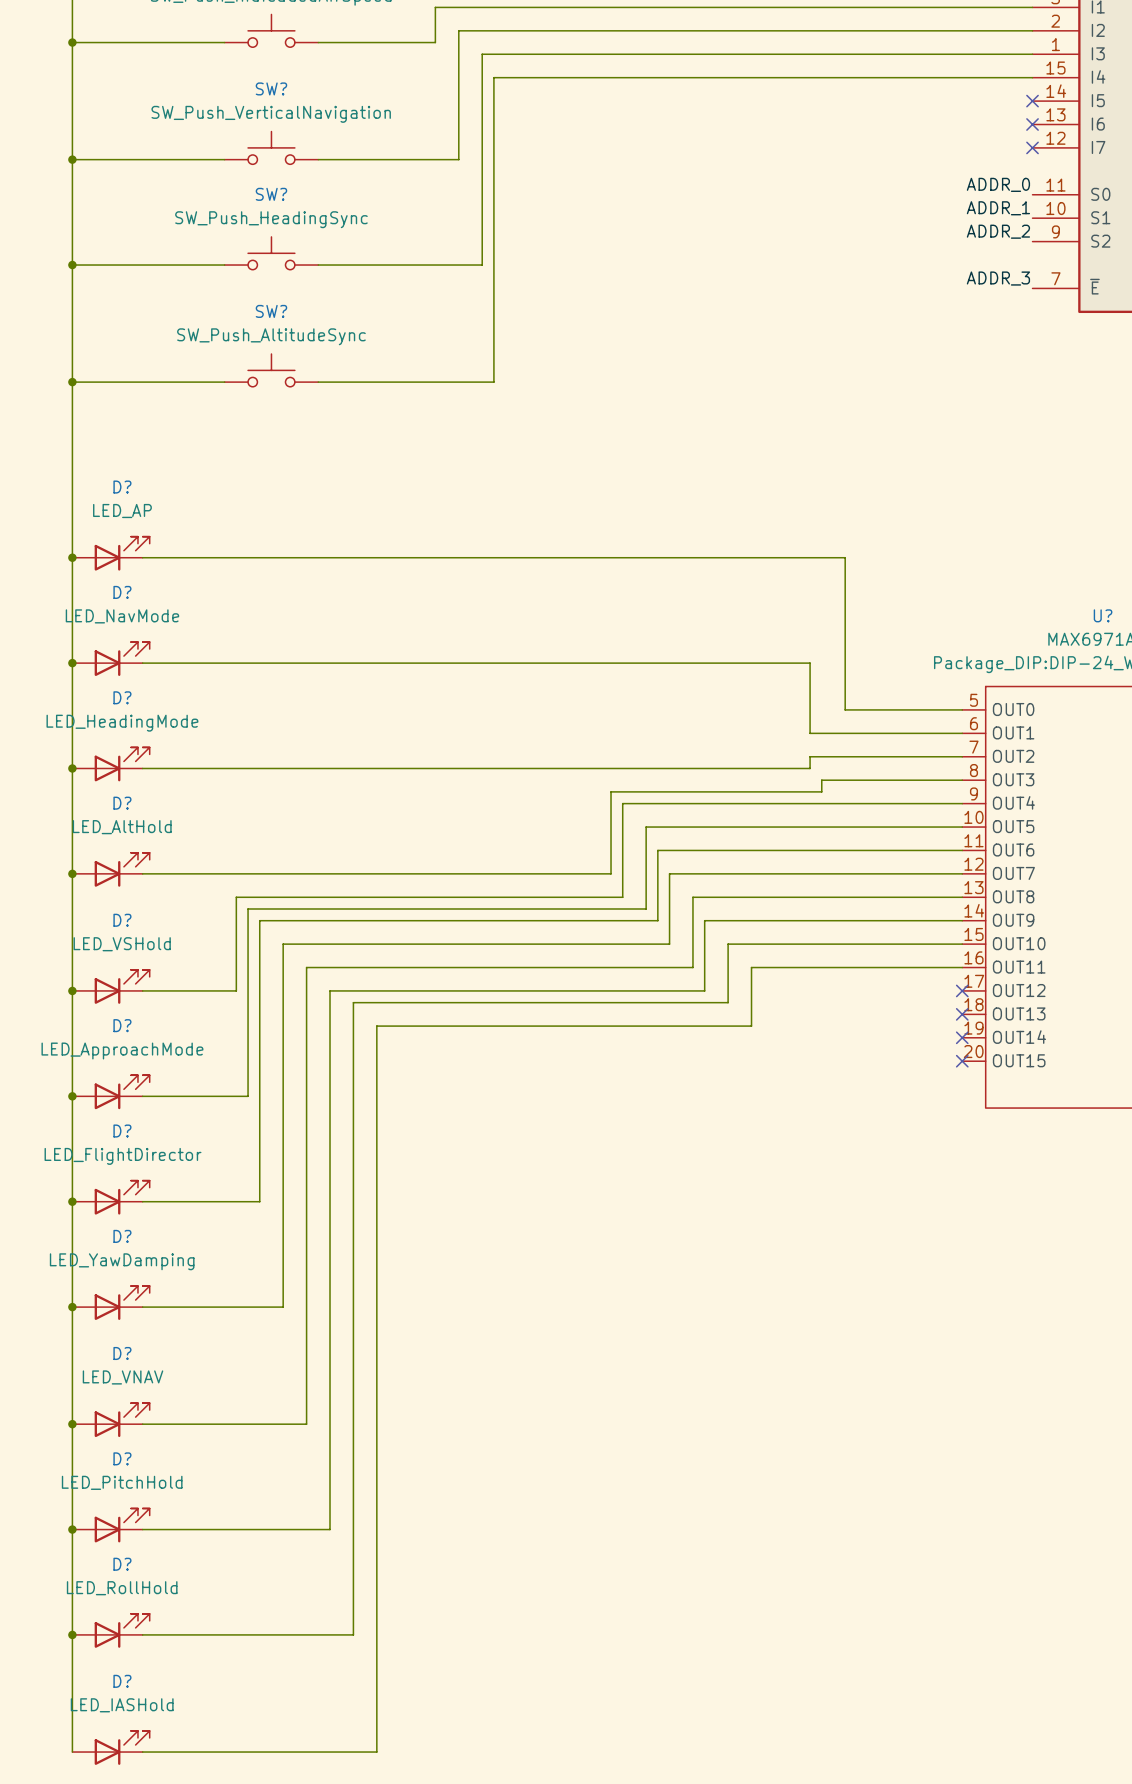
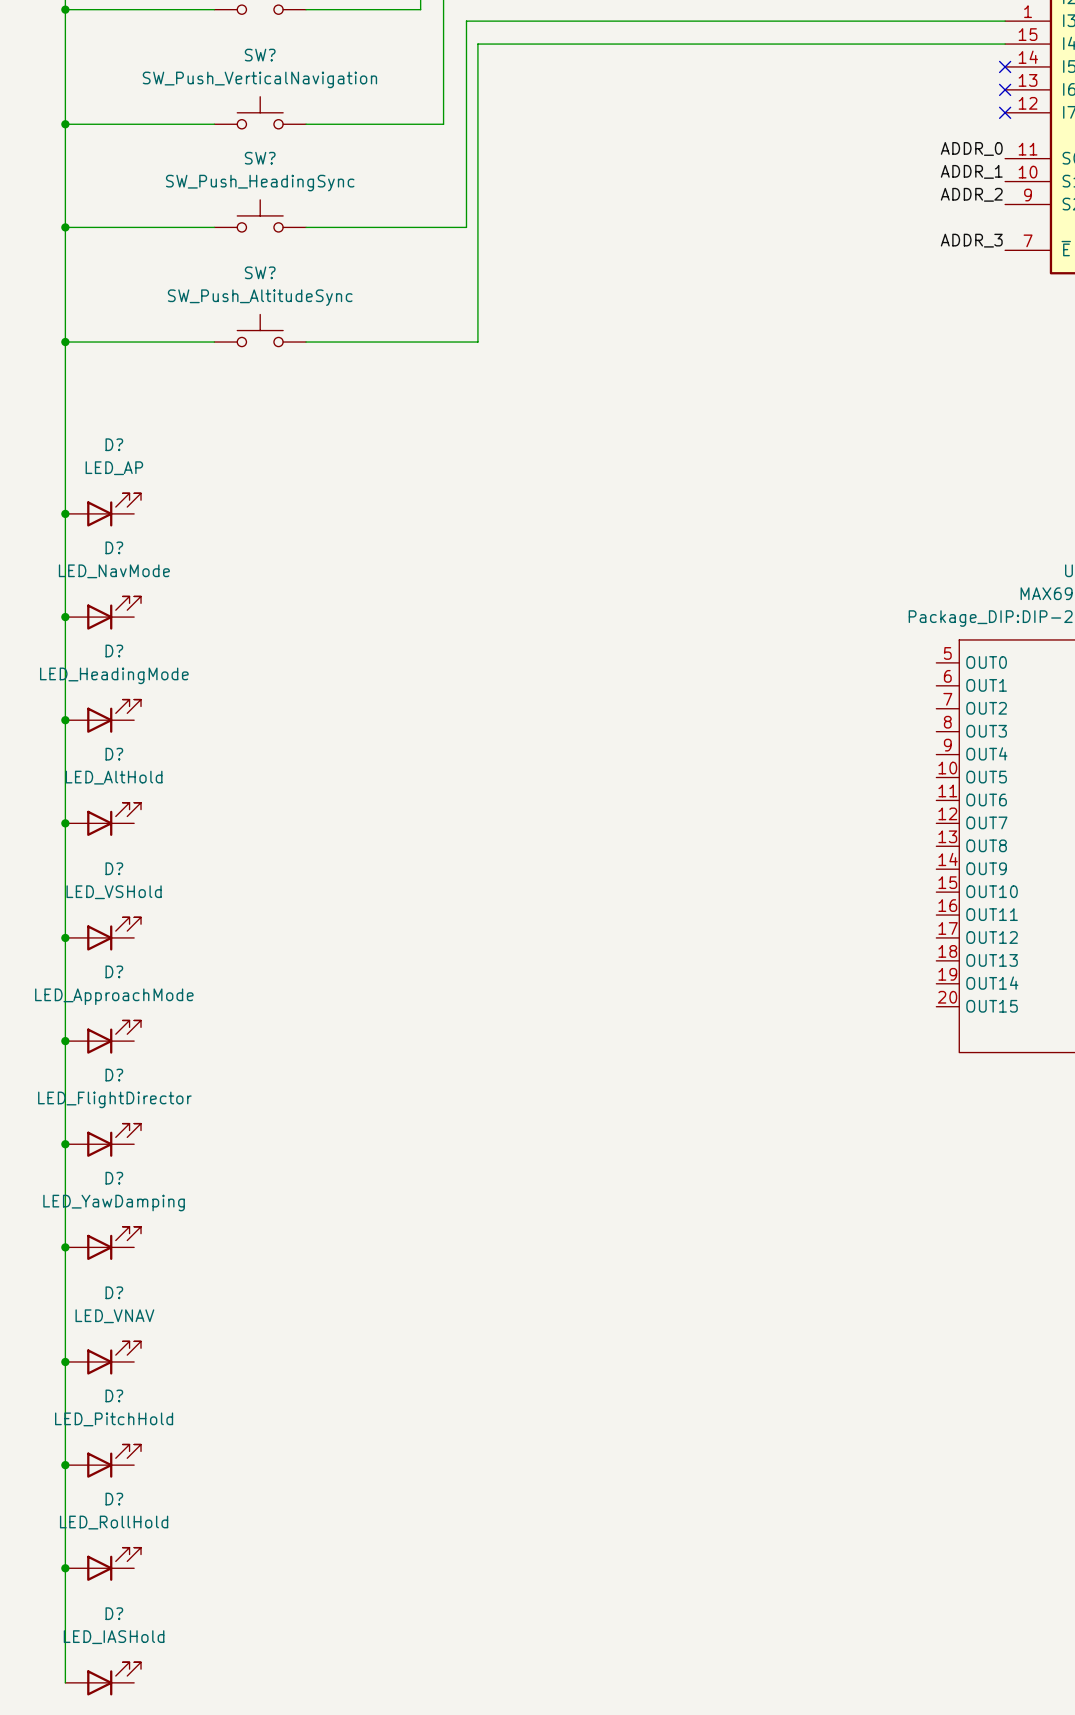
wire: (142, 557) (845, 557) (845, 709) (962, 709) -> none
wire: (142, 663) (810, 663) (810, 733) (962, 733) -> none
wire: (962, 756) (810, 756) (810, 768) (142, 768) -> none
wire: (962, 780) (821, 780) (821, 791) (611, 791) (611, 873) (142, 873) -> none
wire: (962, 803) (622, 803) (622, 897) (236, 897) (236, 990) (142, 990) -> none
wire: (962, 827) (646, 827) (646, 908) (248, 908) (248, 1096) (142, 1096) -> none
wire: (962, 850) (657, 850) (657, 920) (259, 920) (259, 1201) (142, 1201) -> none
wire: (962, 873) (669, 873) (669, 944) (283, 944) (283, 1307) (142, 1307) -> none
wire: (962, 897) (692, 897) (692, 967) (306, 967) (306, 1424) (142, 1424) -> none
wire: (962, 920) (704, 920) (704, 990) (330, 990) (330, 1529) (142, 1529) -> none
wire: (962, 944) (728, 944) (728, 1002) (353, 1002) (353, 1634) (142, 1634) -> none
wire: (962, 967) (751, 967) (751, 1026) (376, 1026) (376, 1752) (142, 1752) -> none
no-connect mark: (962, 990) -> none
no-connect mark: (962, 1014) -> none
no-connect mark: (962, 1037) -> none
no-connect mark: (962, 1061) -> none

